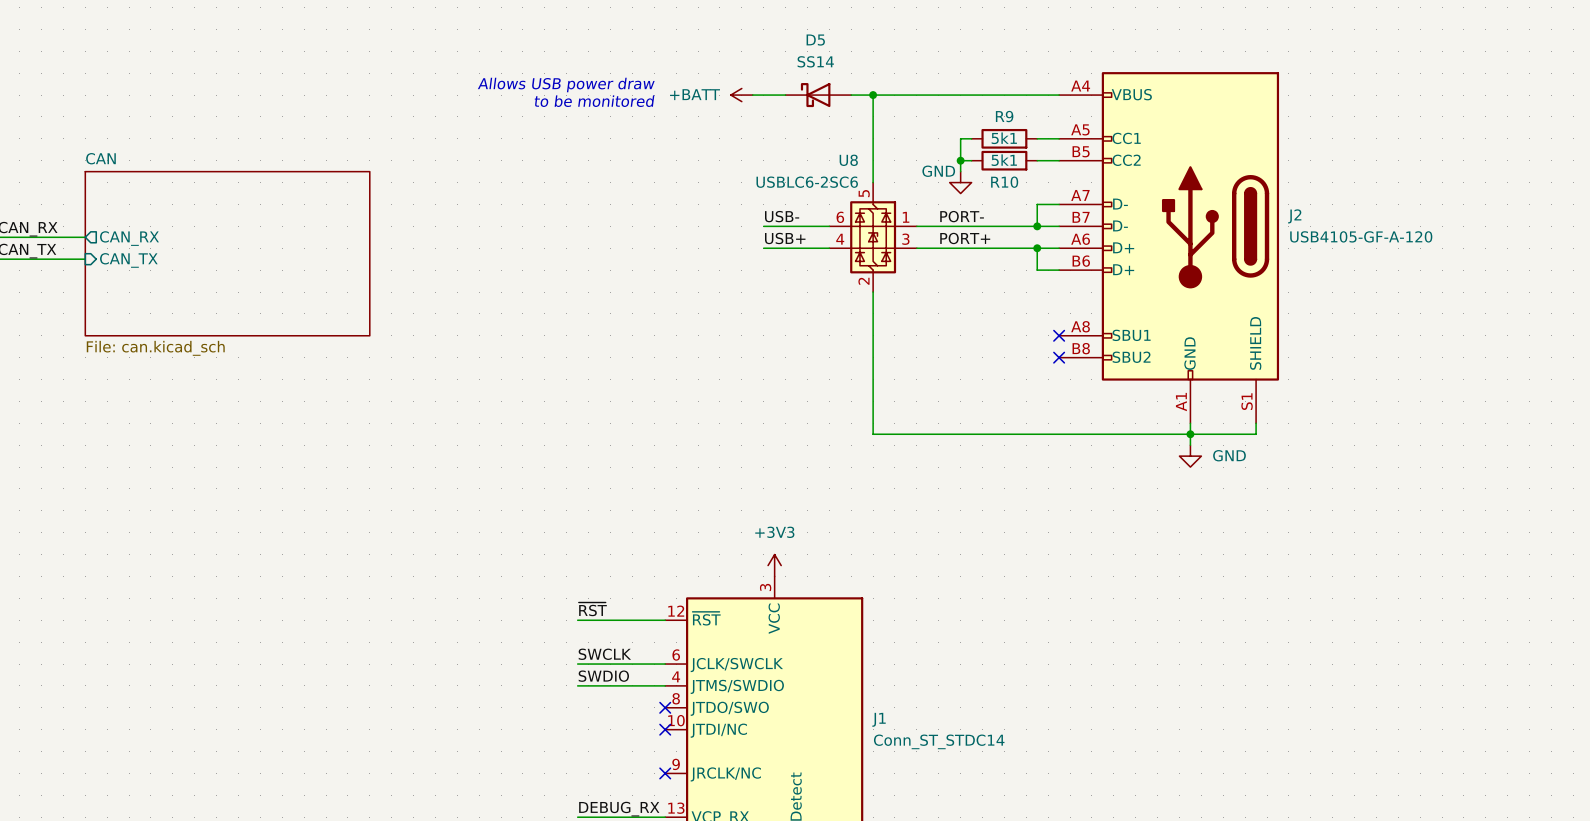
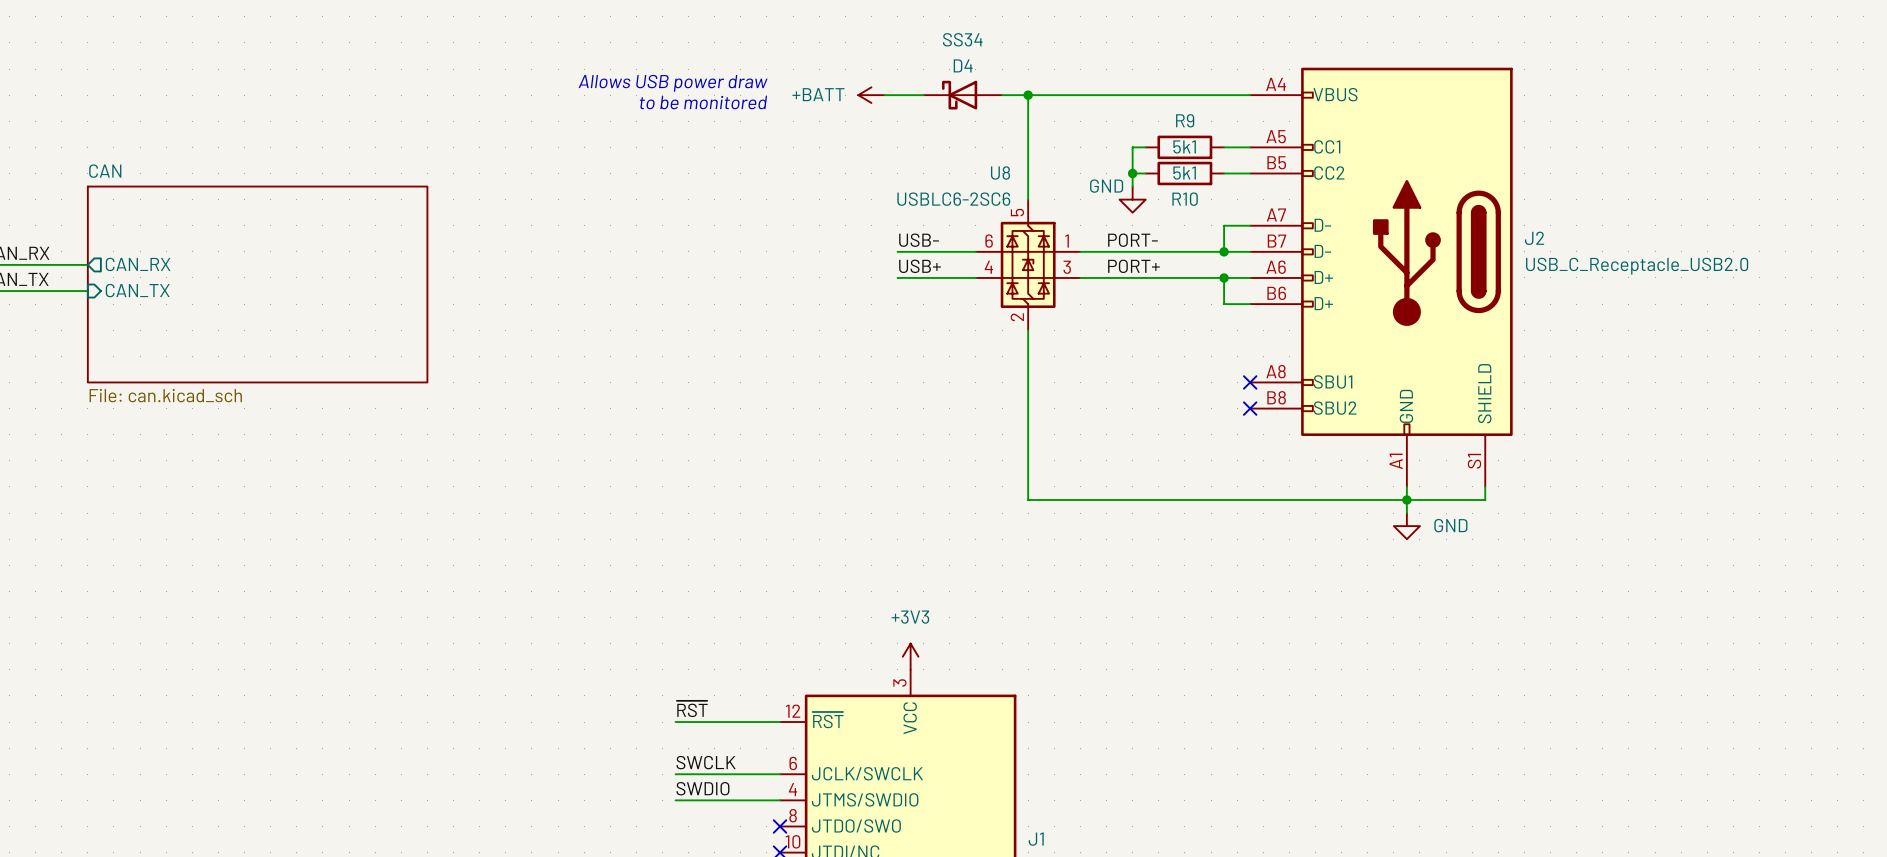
D5 name: D5 (815, 40) -> D4 (963, 65)
D5 value: SS14 (815, 61) -> SS34 (962, 39)
J2 value: USB4105-GF-A-120 (1361, 236) -> USB_C_Receptacle_USB2.0 (1637, 266)

